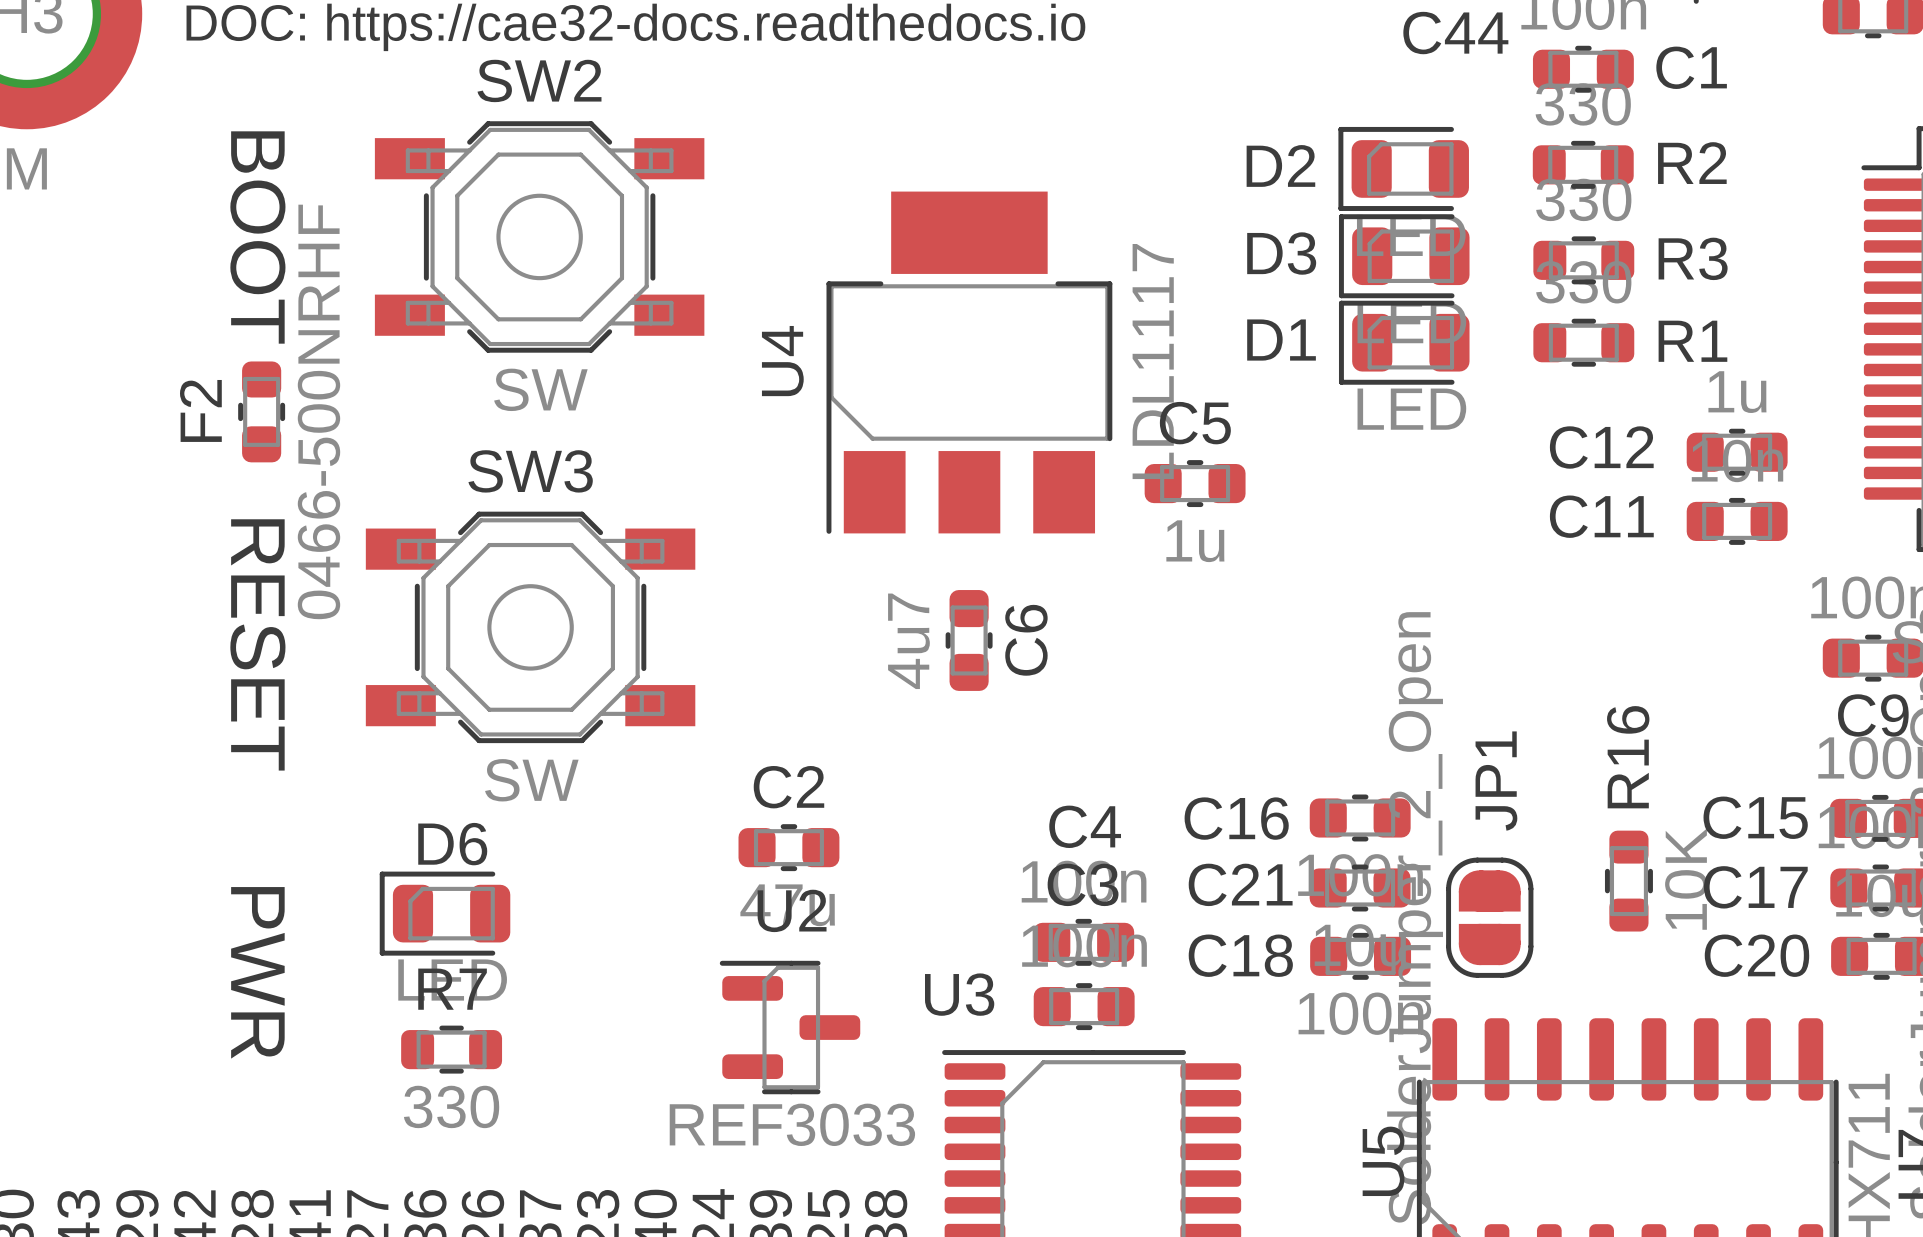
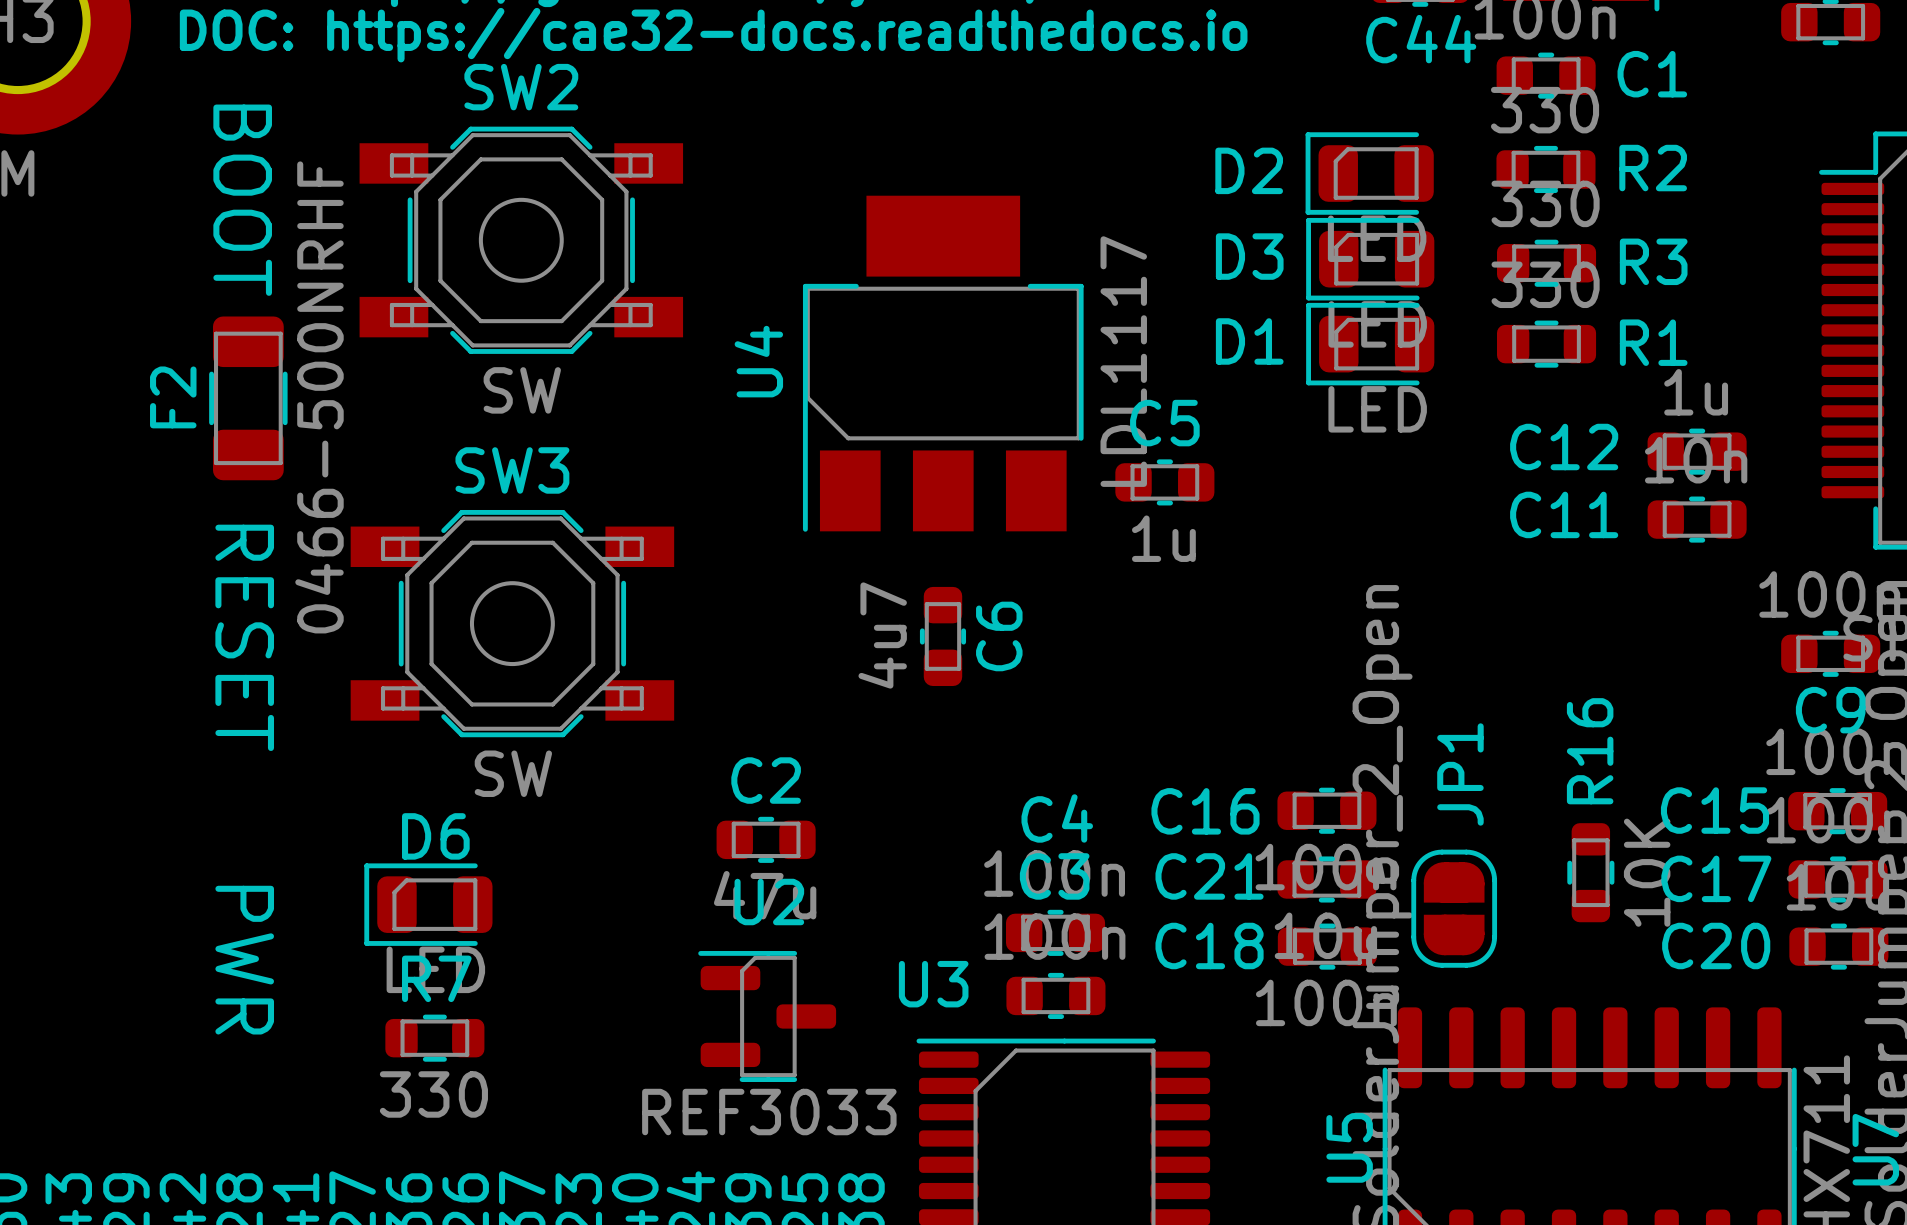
text position: BOOT (257, 237) -> BOOT (242, 200)
F2 footprint: [238, 361, 286, 463] -> [209, 316, 288, 481]

